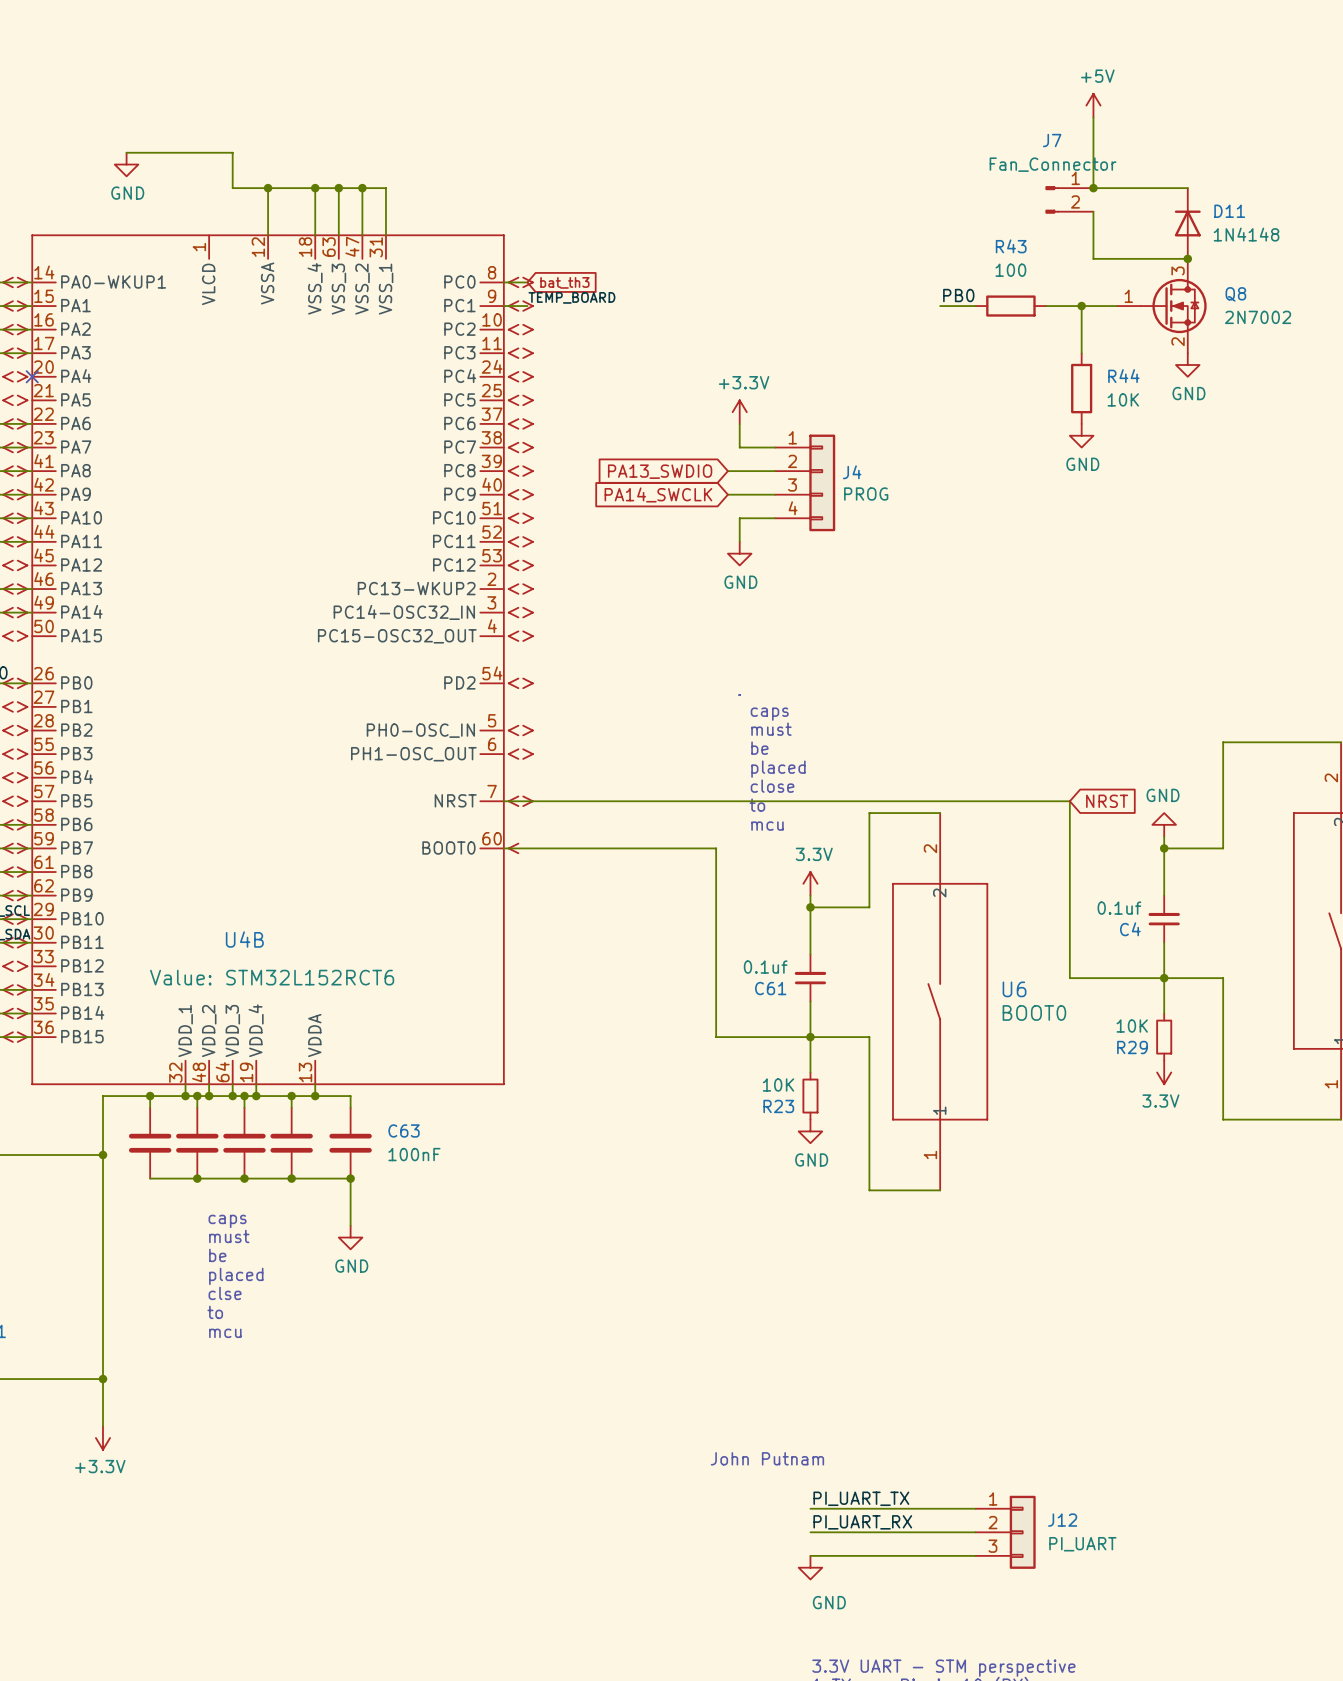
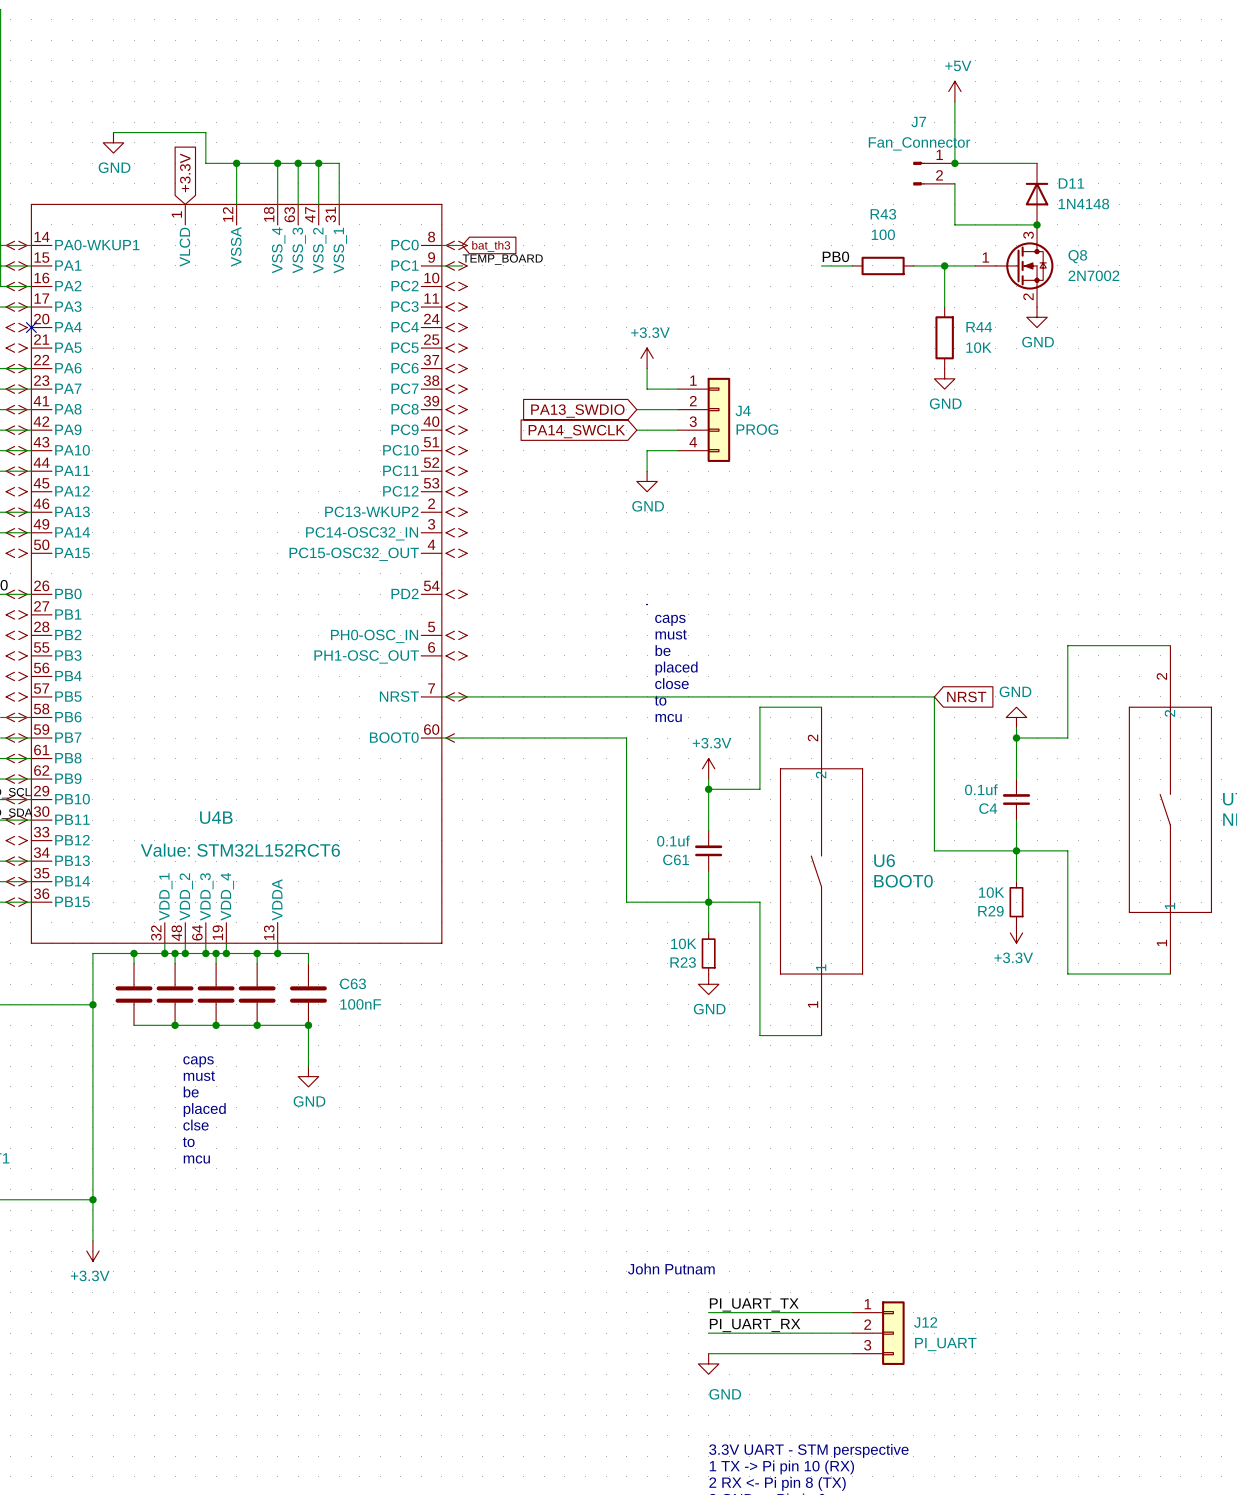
global label: none -> +3.3V (185, 172)
power symbol: 3.3V (810, 883) -> +3.3V (708, 768)
power symbol: 3.3V (1164, 1072) -> +3.3V (1016, 932)

